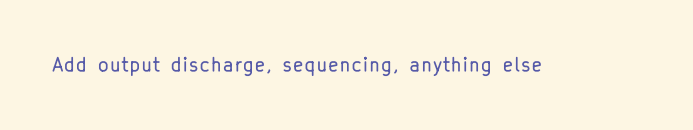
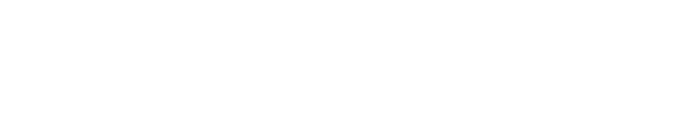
text: Add output discharge, sequencing, anything else (296, 66) -> none

